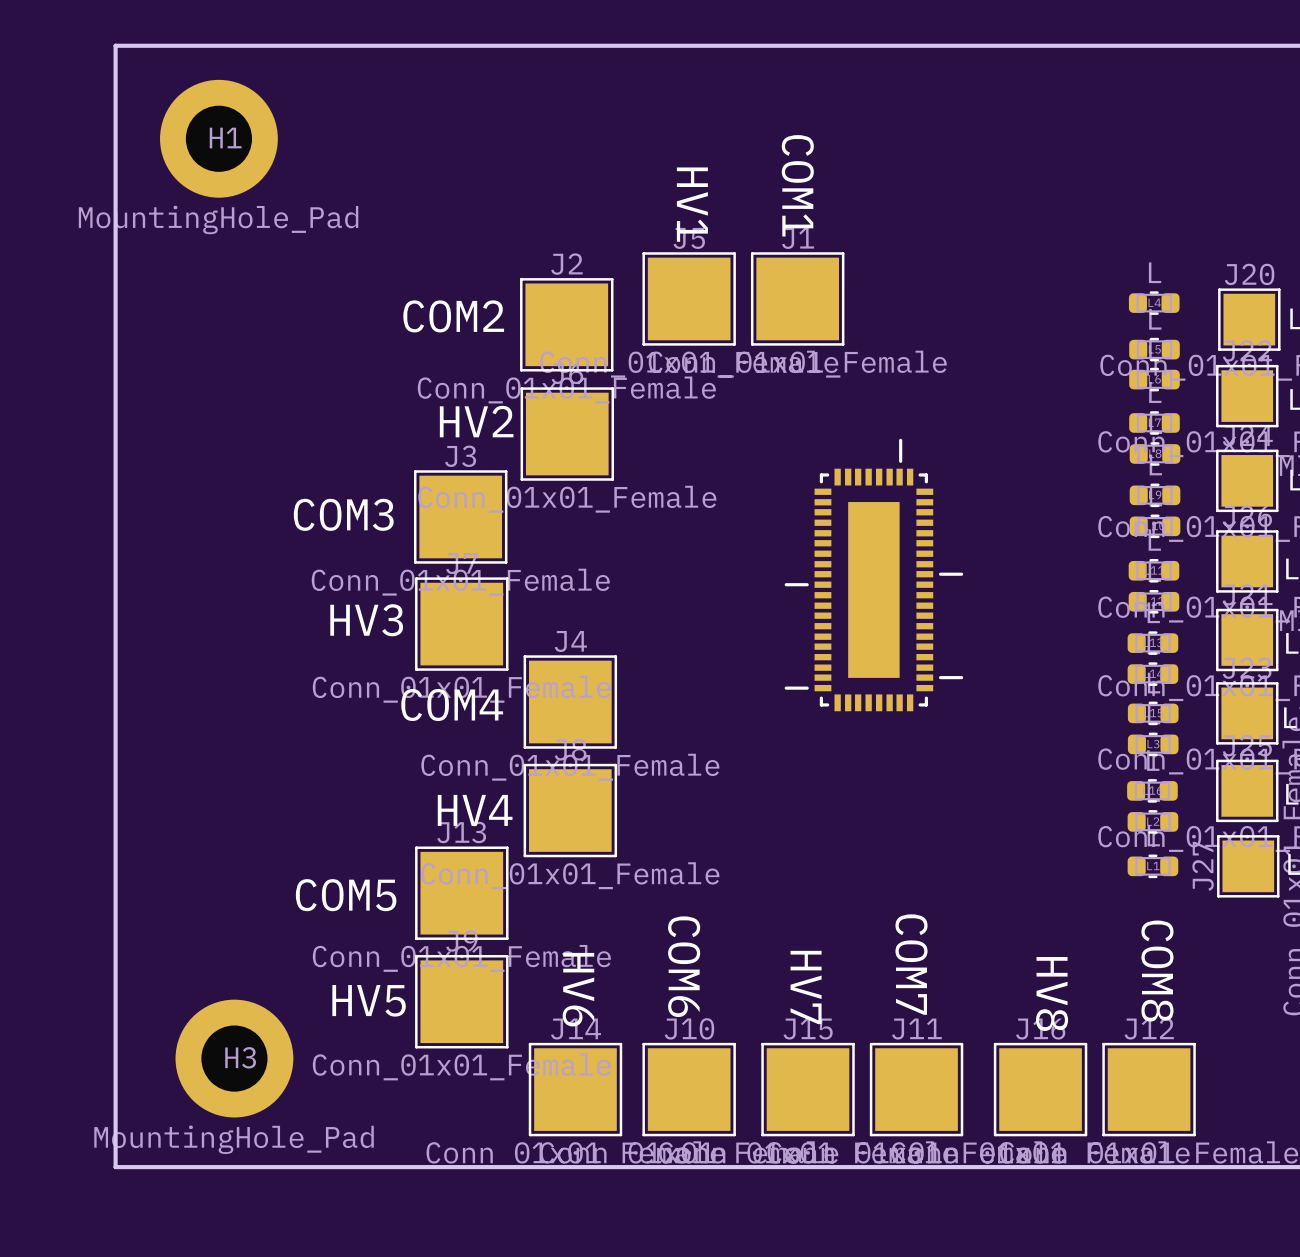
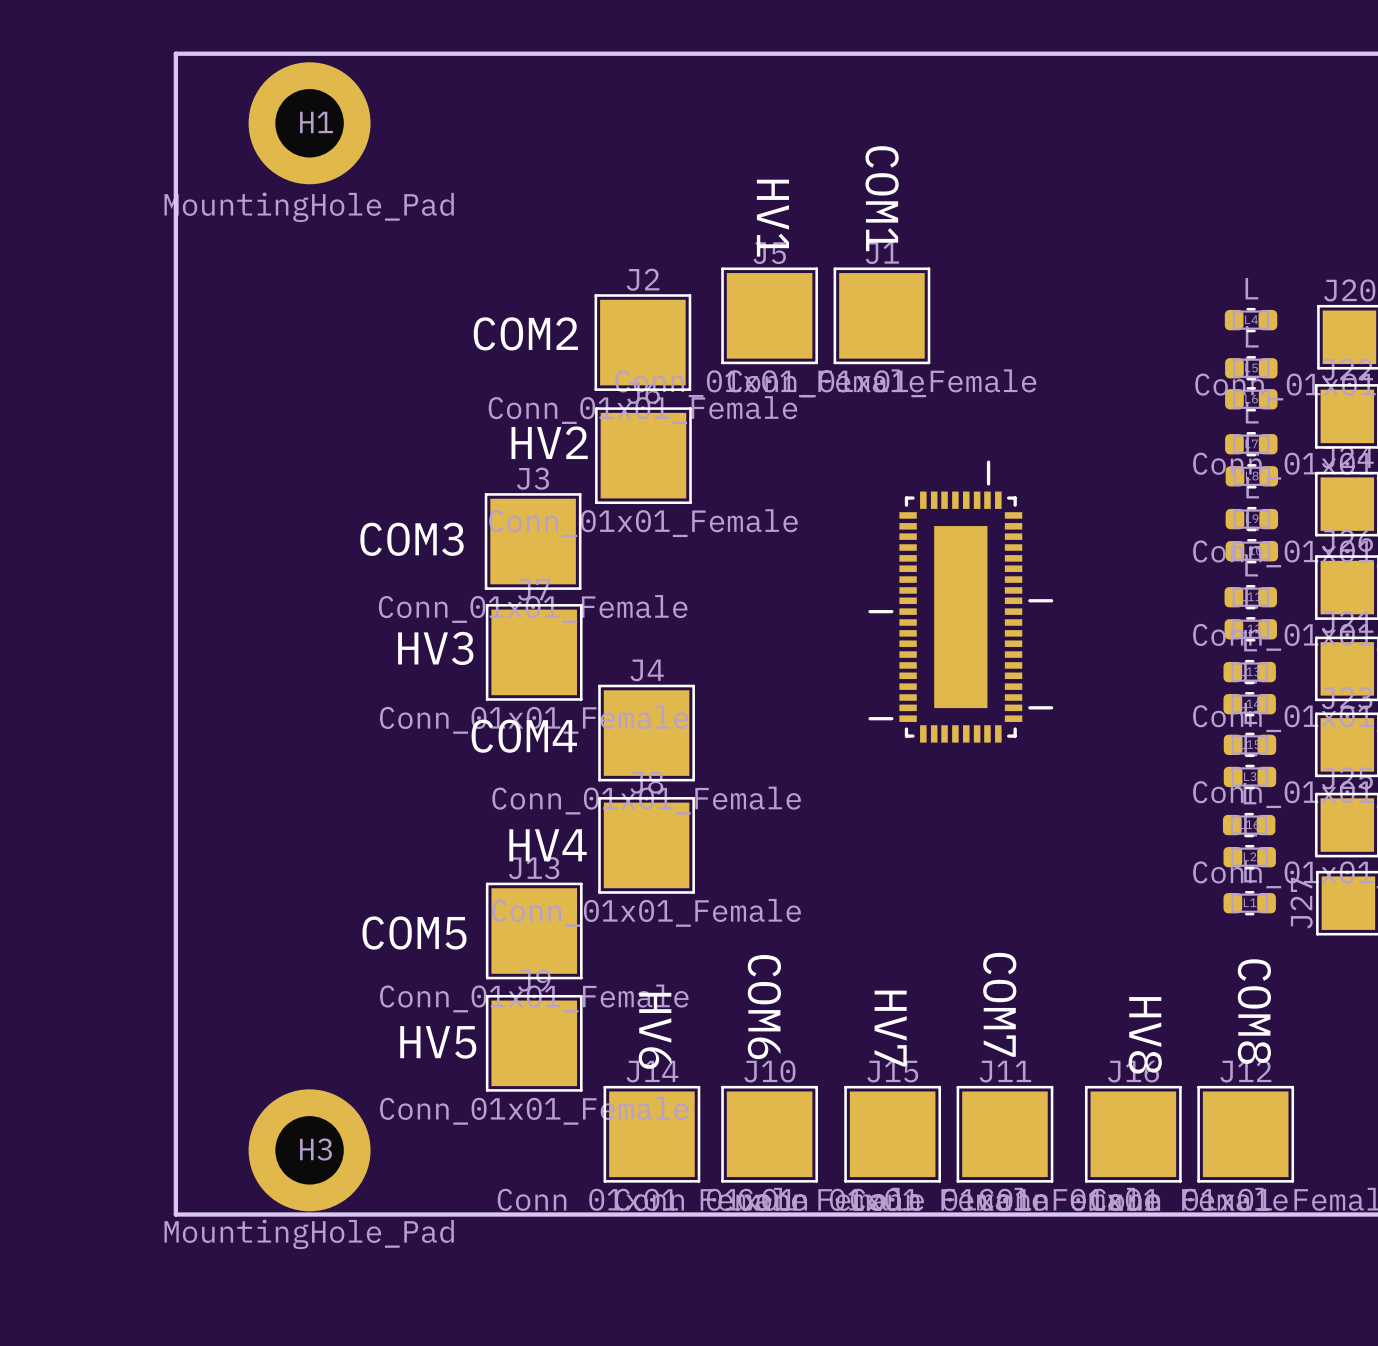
H1 position: (218, 138) -> (309, 123)
H3 position: (234, 1058) -> (309, 1150)

